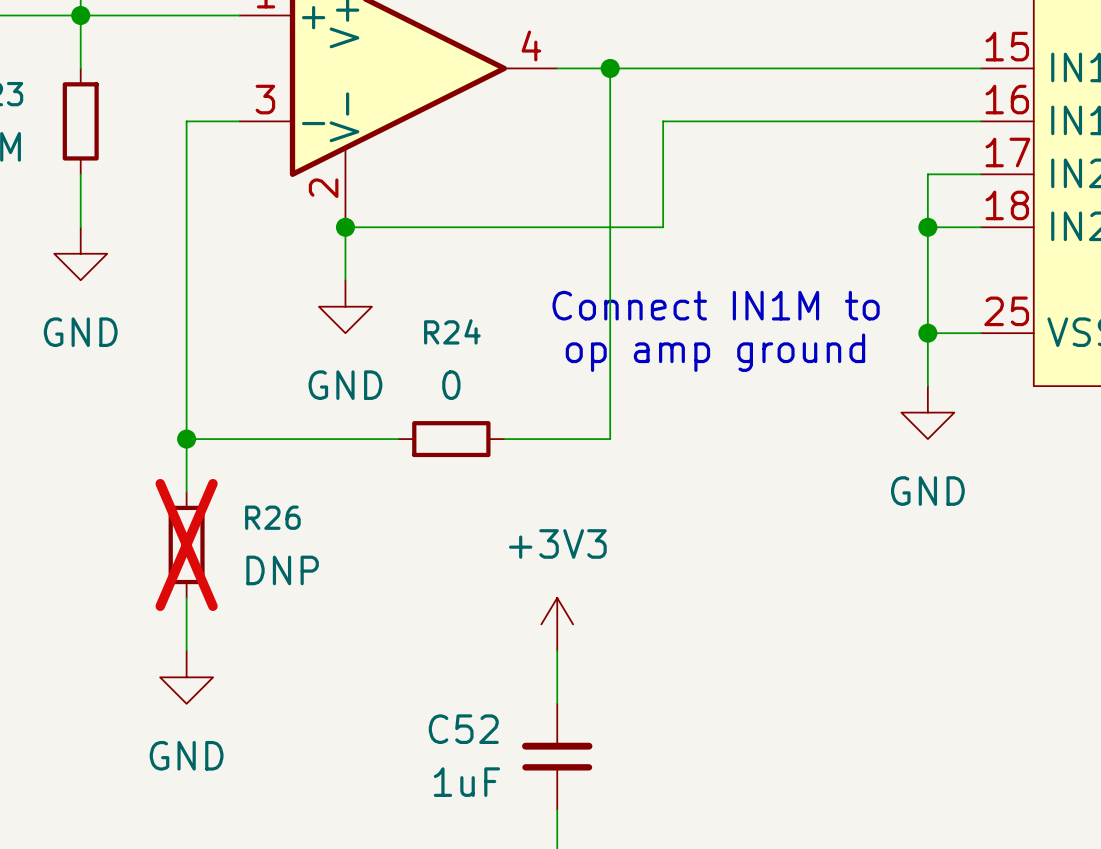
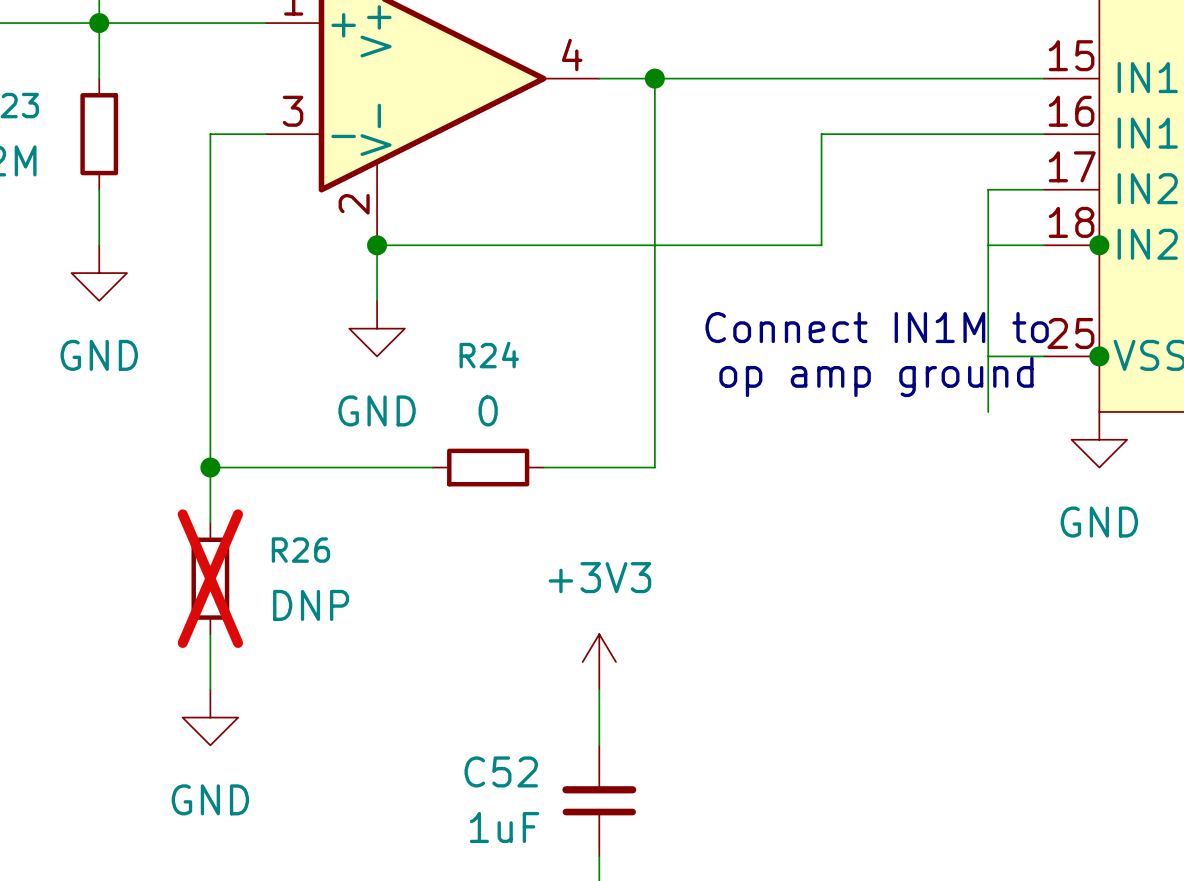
wire: (769, 121) (663, 121) (663, 227) -> (821, 134) (821, 245) (710, 245)
junction: (927, 227) -> none
junction: none -> (1099, 245)
text position: Connect IN1M to (716, 305) -> Connect IN1M to (877, 327)
junction: (927, 333) -> none
junction: none -> (1099, 356)
text position: op amp ground (715, 352) -> op amp ground (876, 376)
power symbol position: GND (927, 412) -> GND (1099, 439)

